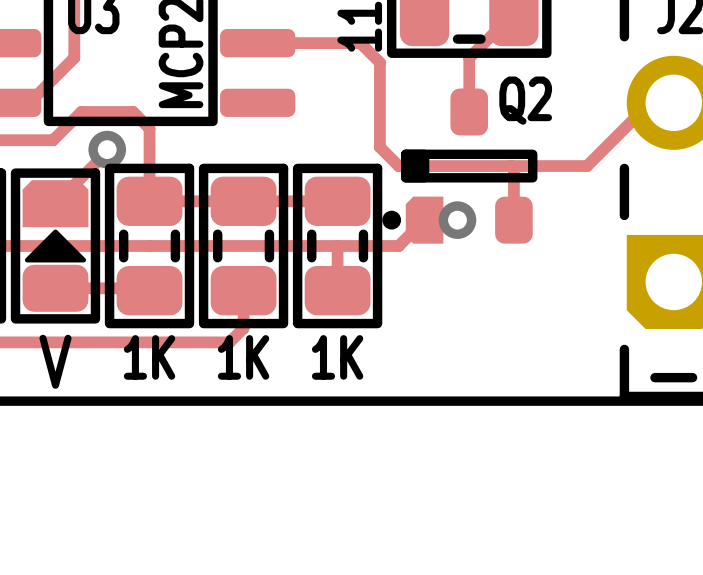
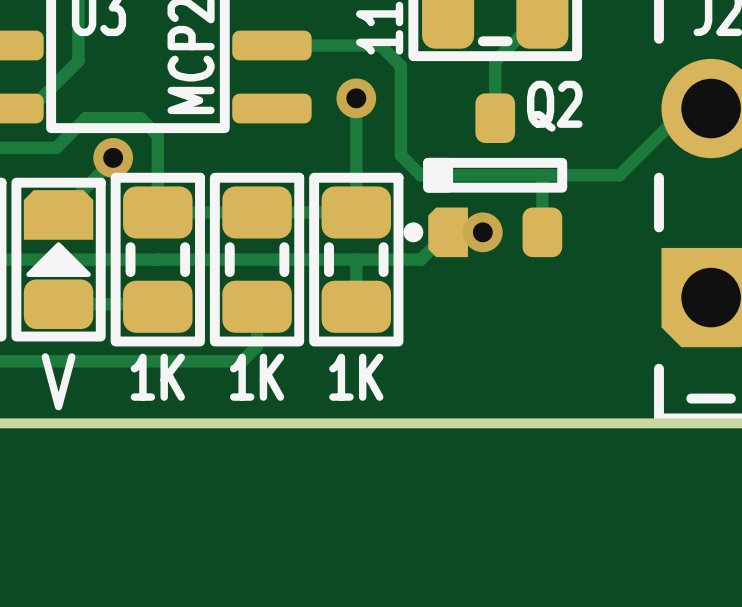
track: none -> (356, 98) (356, 212)
via: none -> (356, 98)

